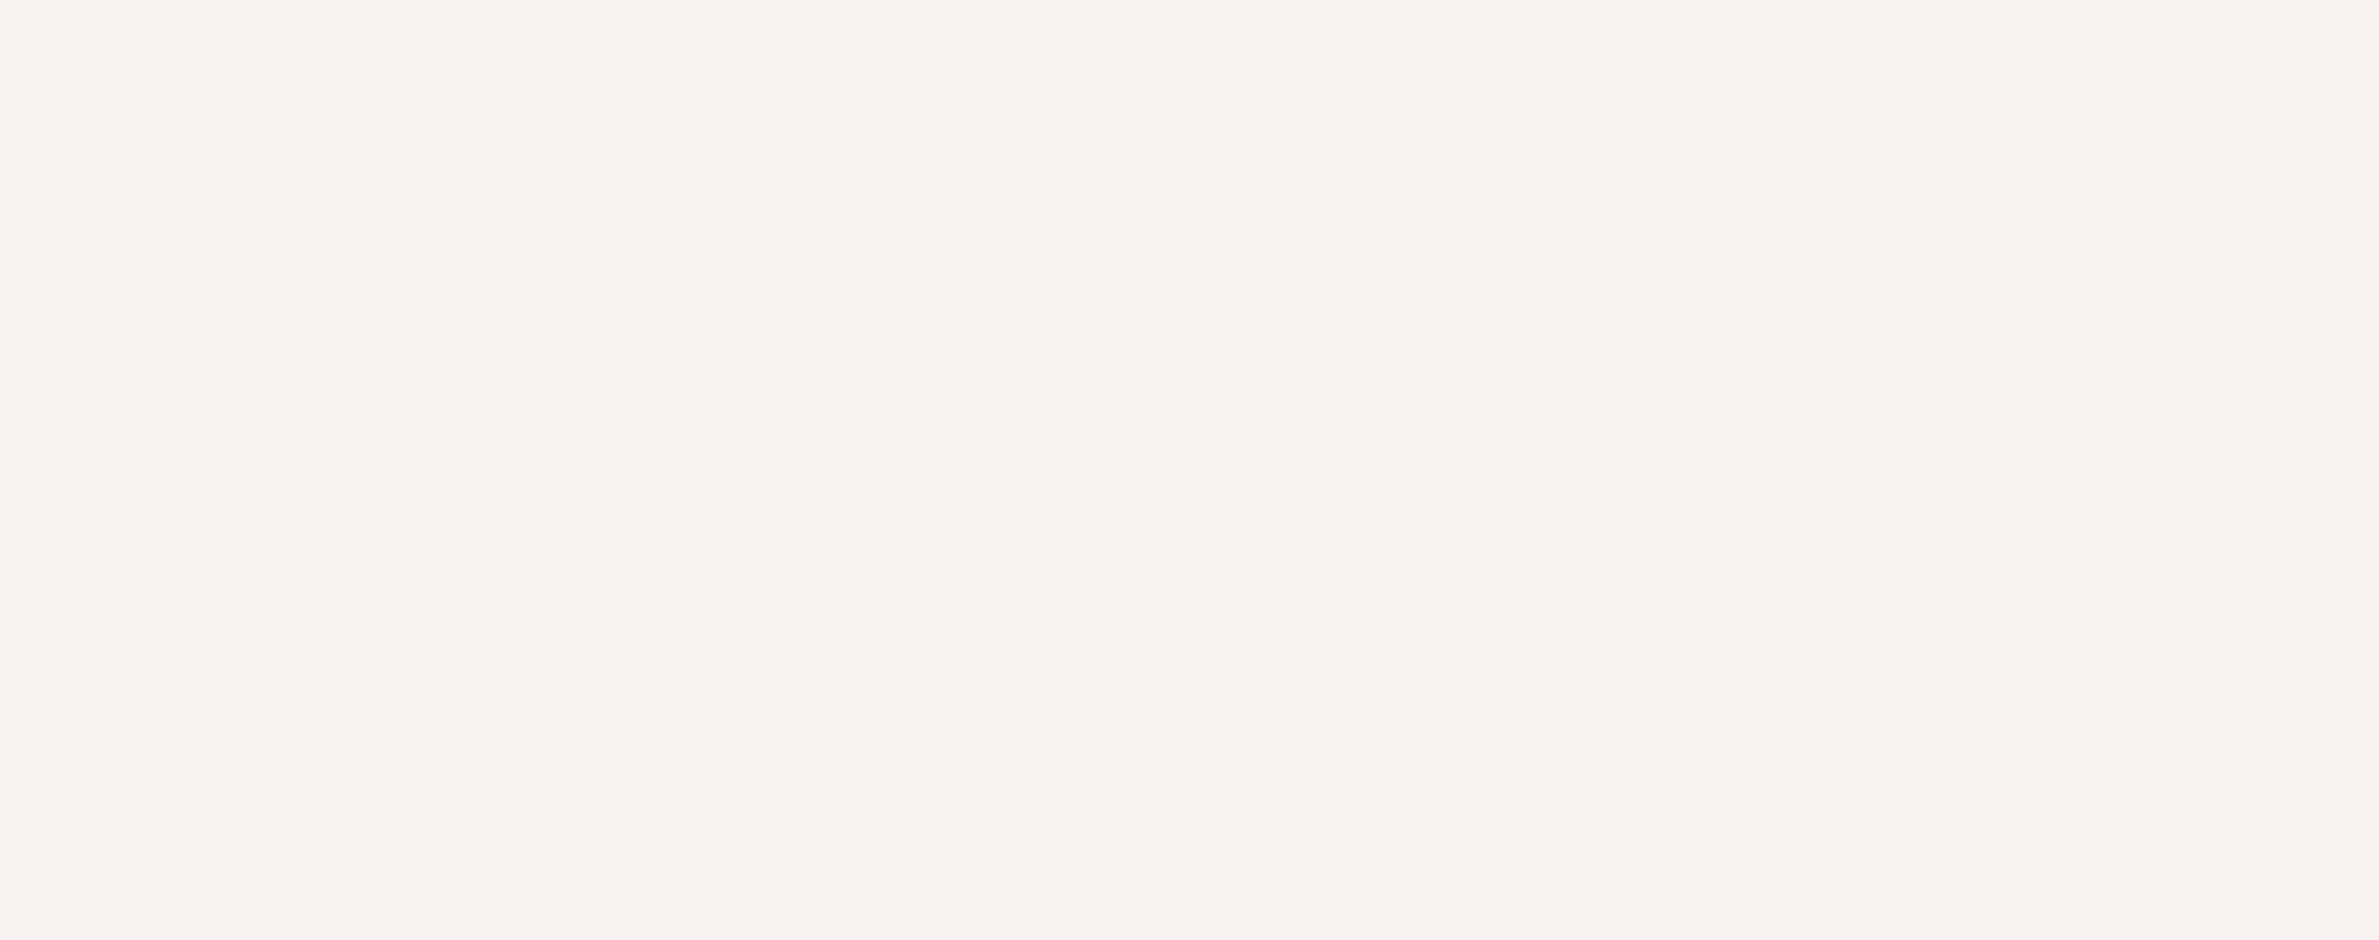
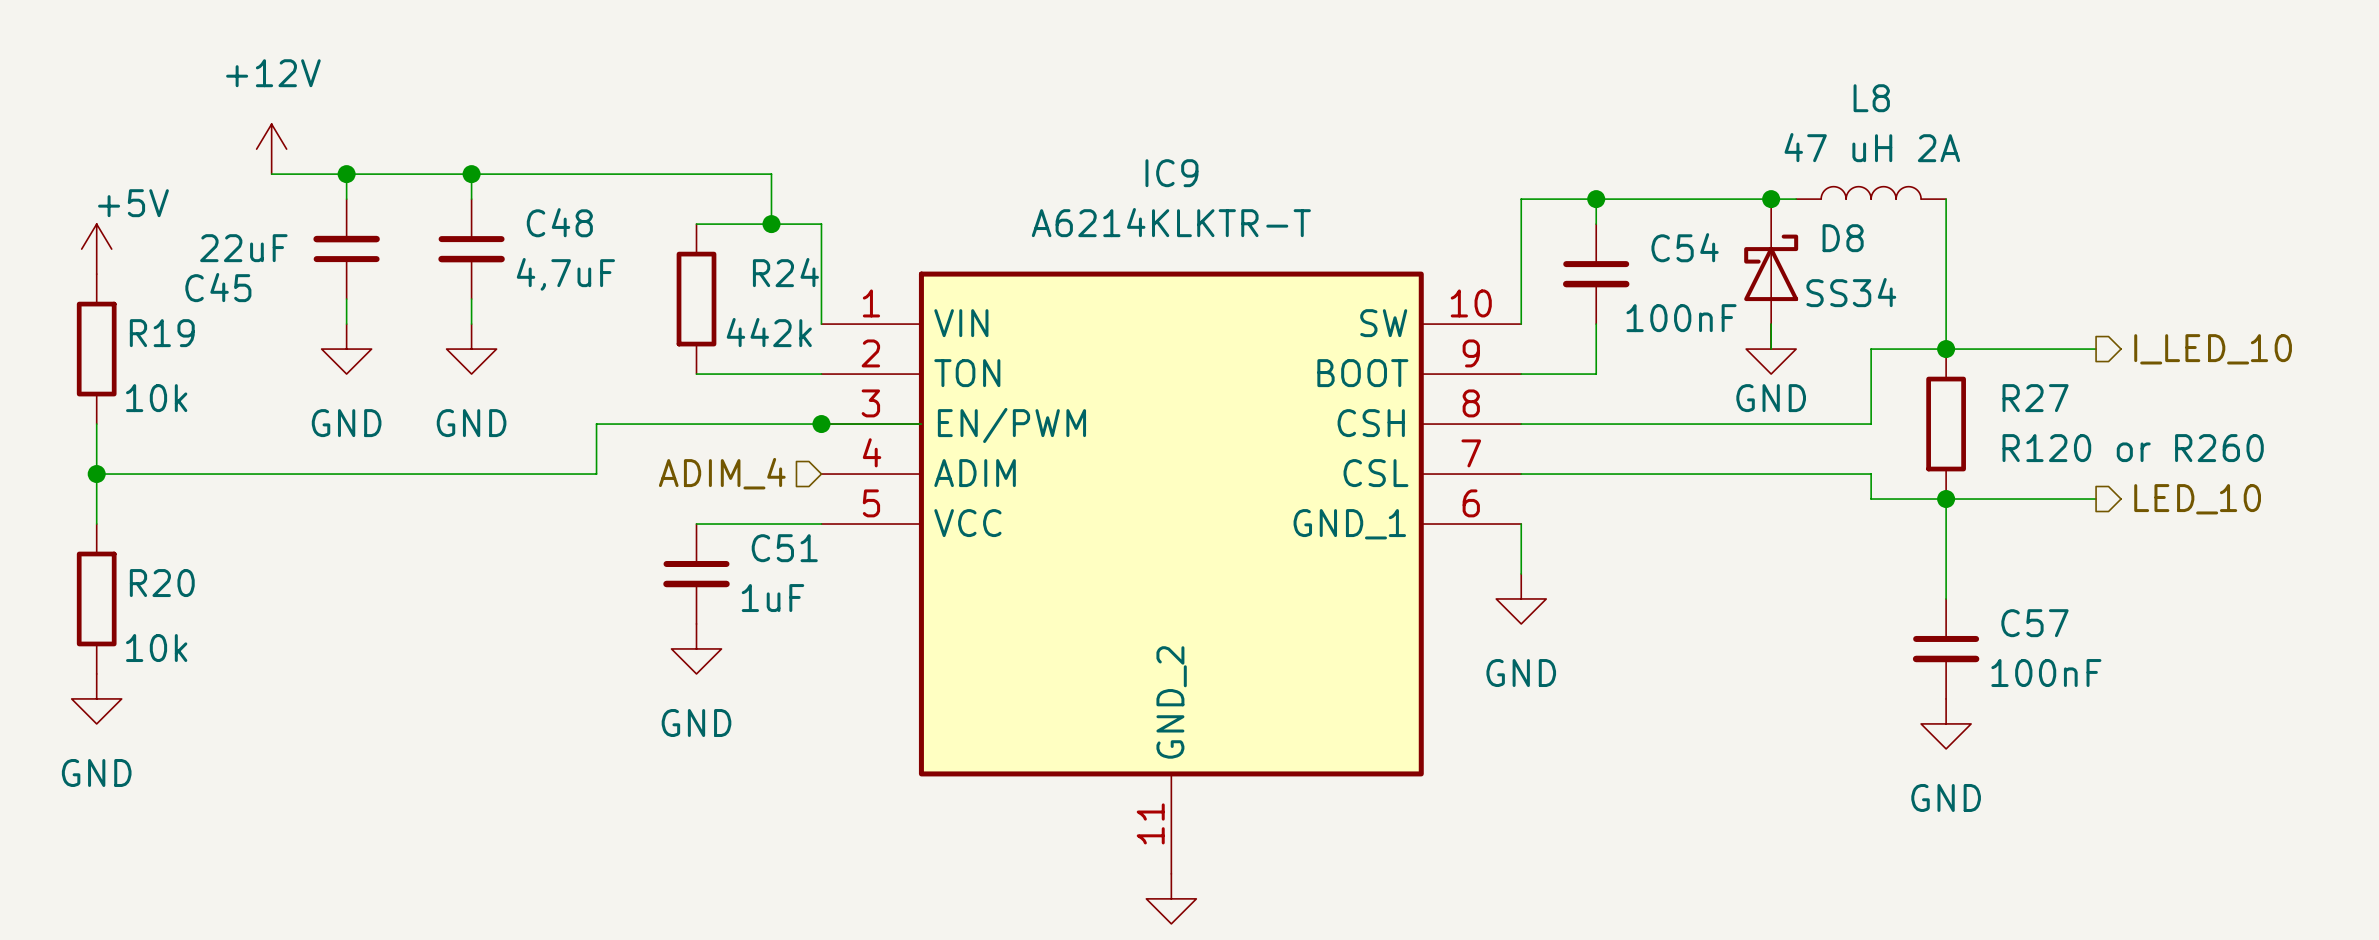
power symbol: none -> +12V (271, 149)
wire: none -> (271, 174) (771, 174) (771, 224)
wire: none -> (346, 174) (346, 199)
junction: none -> (346, 174)
wire: none -> (471, 174) (471, 199)
junction: none -> (471, 174)
L8: none -> 47 uH 2A (1871, 192)
wire: none -> (1596, 199) (1596, 224)
junction: none -> (1596, 199)
junction: none -> (1771, 199)
wire: none -> (1796, 199) (1521, 199) (1521, 324)
wire: none -> (1946, 199) (1946, 349)
wire: none -> (696, 224) (821, 224) (821, 324)
junction: none -> (771, 224)
power symbol: none -> +5V (96, 249)
C45: none -> 22uF (346, 249)
C48: none -> 4,7uF (471, 249)
C54: none -> 100nF (1596, 274)
D8: none -> SS34 (1771, 274)
wire: none -> (346, 299) (346, 324)
wire: none -> (471, 299) (471, 324)
R24: none -> 442k (696, 299)
wire: none -> (1596, 324) (1596, 374) (1521, 374)
wire: none -> (1771, 324) (1771, 349)
R19: none -> 10k (96, 349)
power symbol: none -> GND (346, 349)
power symbol: none -> GND (471, 349)
power symbol: none -> GND (1771, 349)
junction: none -> (1946, 349)
wire: none -> (2096, 349) (1871, 349) (1871, 424) (1521, 424)
hierarchical label: none -> I_LED_10 (2213, 349)
wire: none -> (696, 374) (821, 374)
wire: none -> (96, 424) (96, 524)
junction: none -> (821, 424)
wire: none -> (921, 424) (596, 424) (596, 474) (96, 474)
R27: none -> R120 or R260 (1946, 424)
hierarchical label: none -> ADIM_4 (722, 473)
junction: none -> (96, 474)
wire: none -> (1521, 474) (1871, 474) (1871, 499) (2096, 499)
wire: none -> (1946, 499) (1946, 598)
junction: none -> (1946, 499)
hierarchical label: none -> LED_10 (2197, 499)
wire: none -> (696, 524) (821, 524)
wire: none -> (1521, 524) (1521, 573)
IC9: none -> A6214KLKTR-T (1171, 572)
C51: none -> 1uF (696, 573)
R20: none -> 10k (96, 598)
power symbol: none -> GND (1521, 598)
power symbol: none -> GND (696, 648)
C57: none -> 100nF (1946, 648)
power symbol: none -> GND (96, 698)
power symbol: none -> GND (1946, 723)
power symbol: none -> (1171, 898)

